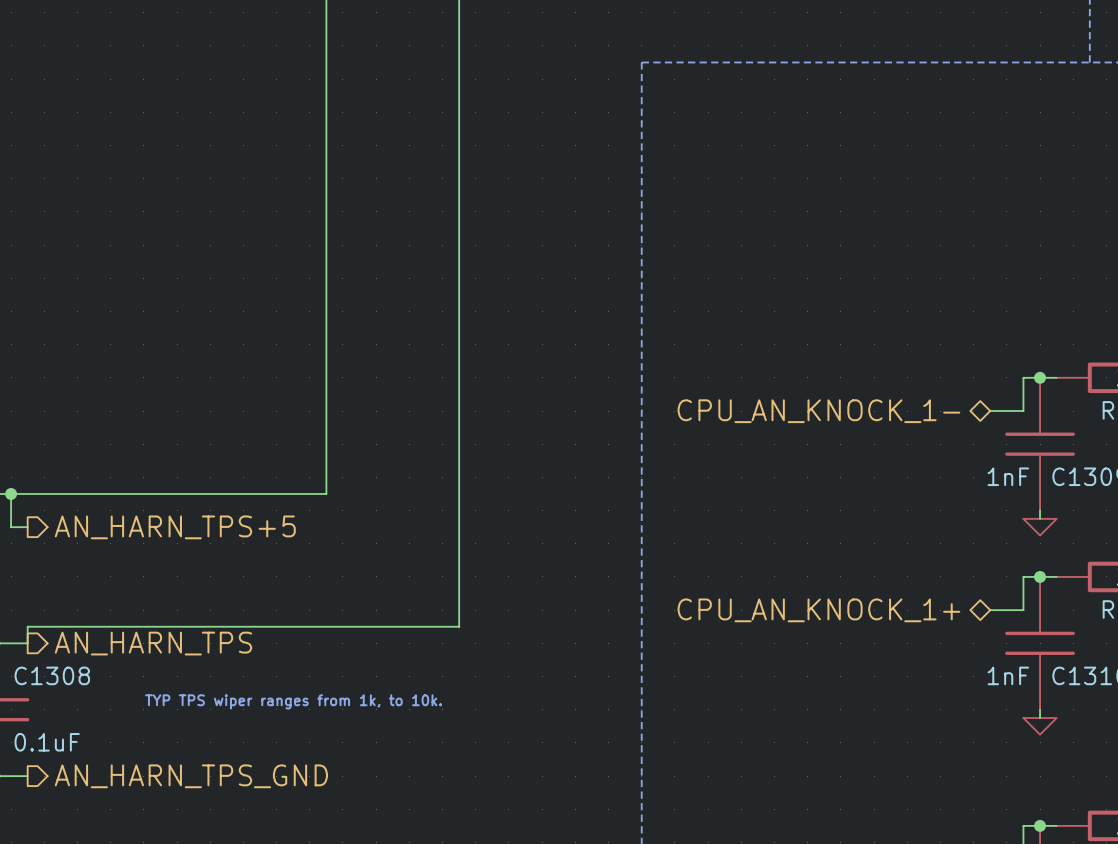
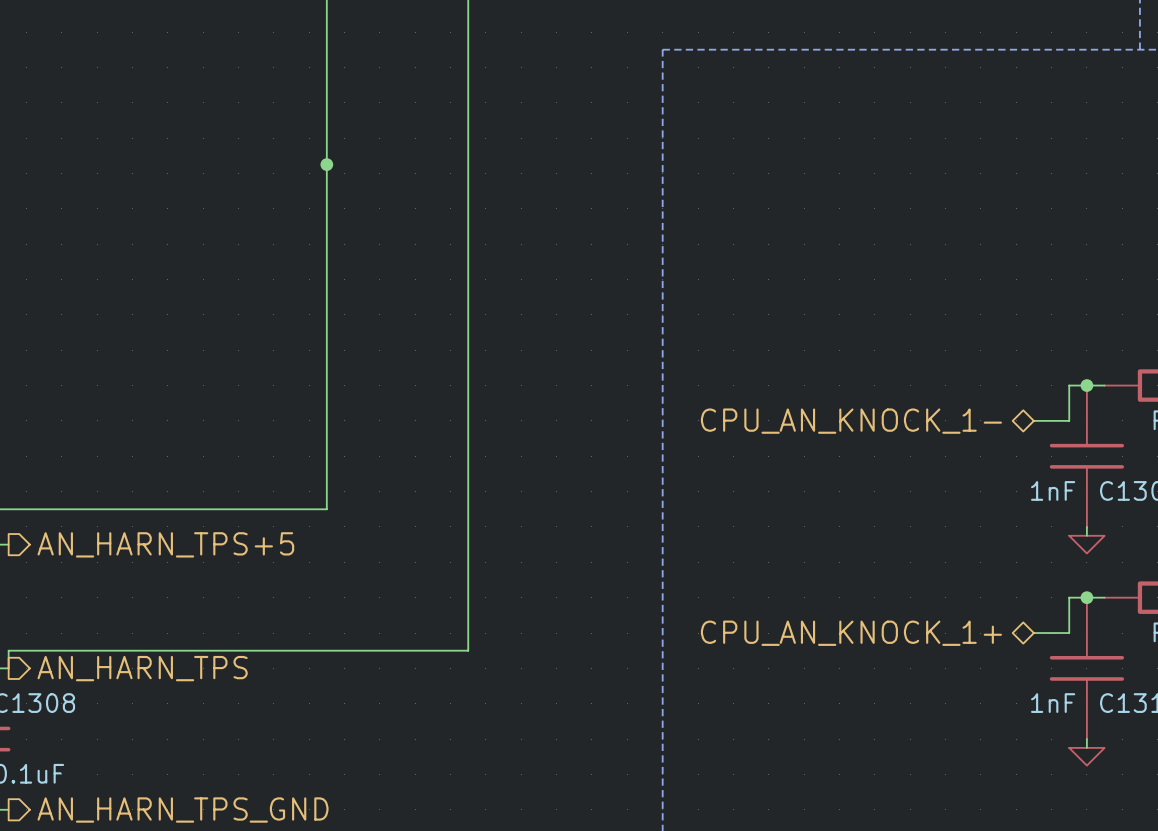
junction: none -> (326, 164)
text: TYP TPS wiper ranges from 1k, to 10k. (293, 701) -> none

